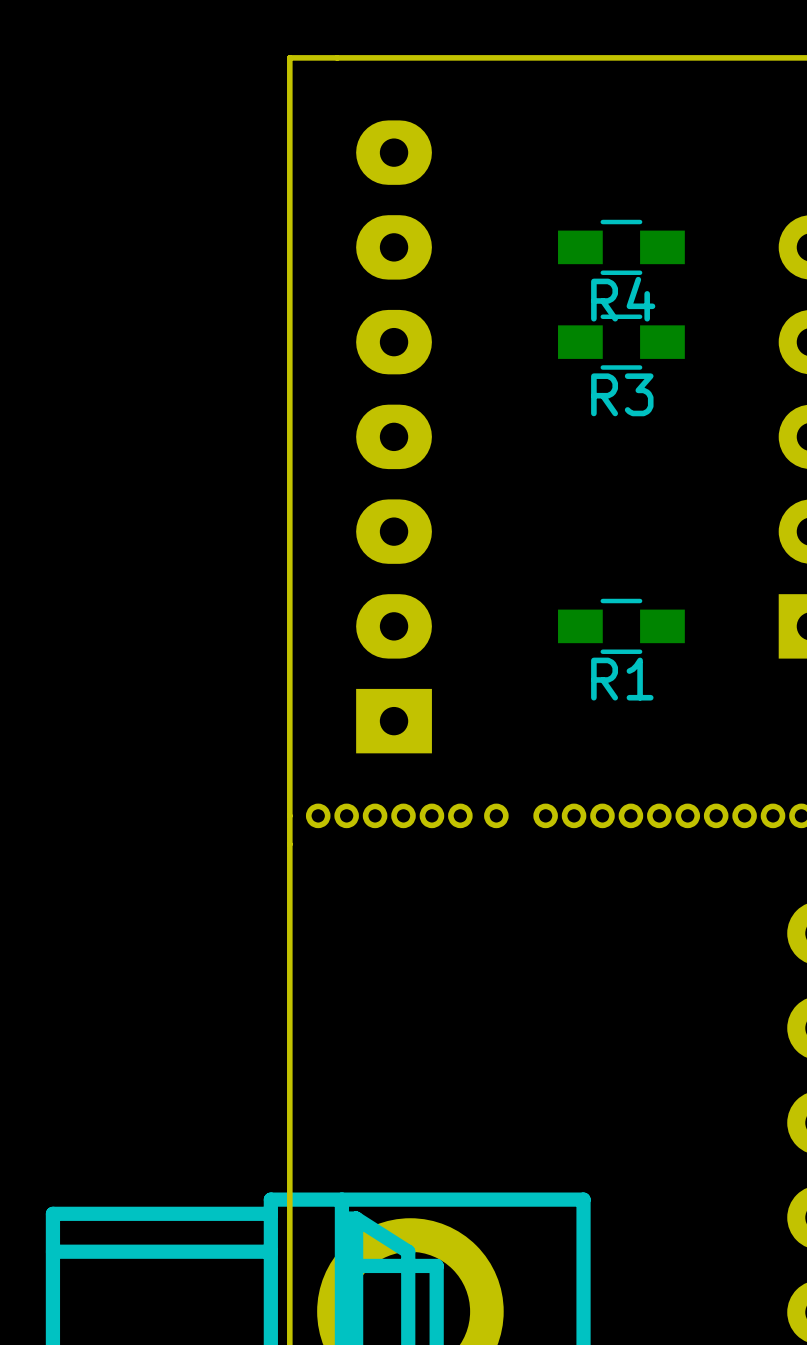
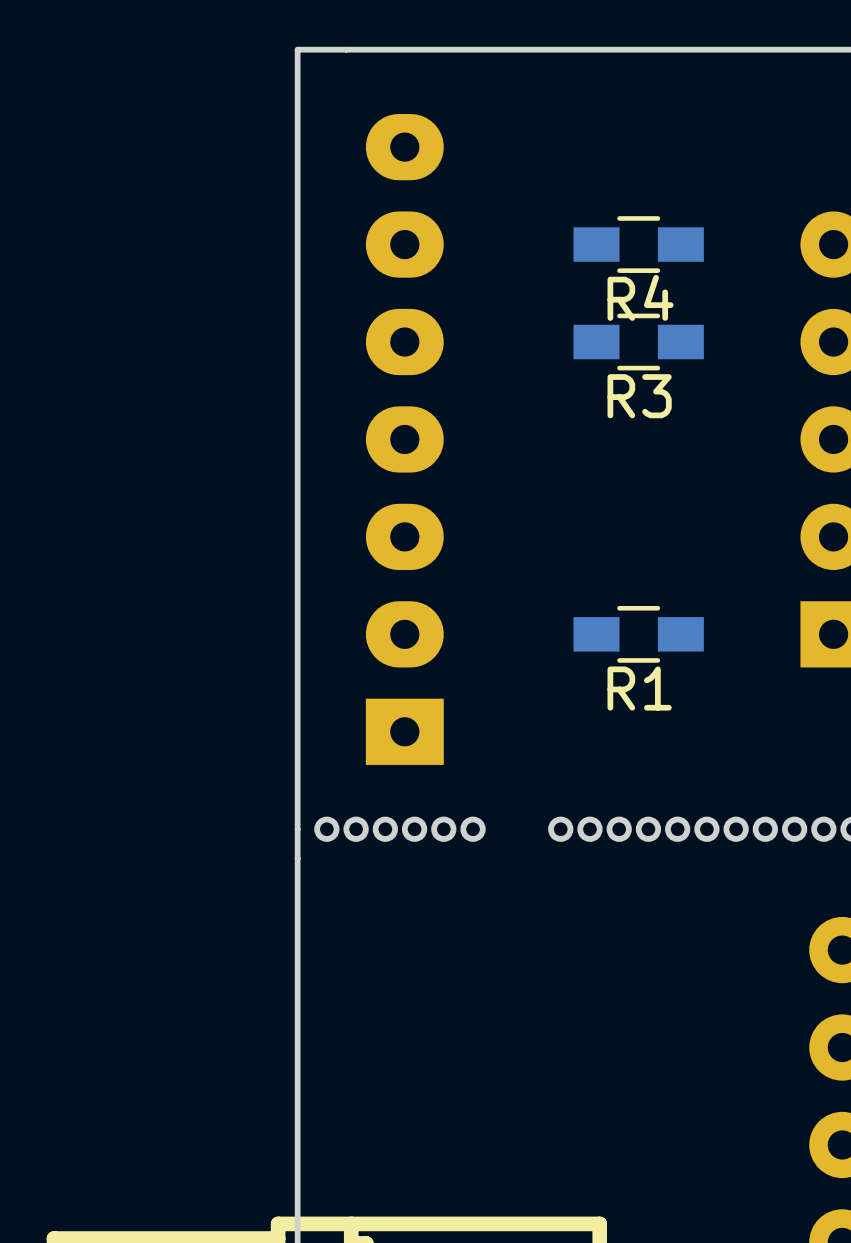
round board edge: [484, 803, 509, 829] -> none

